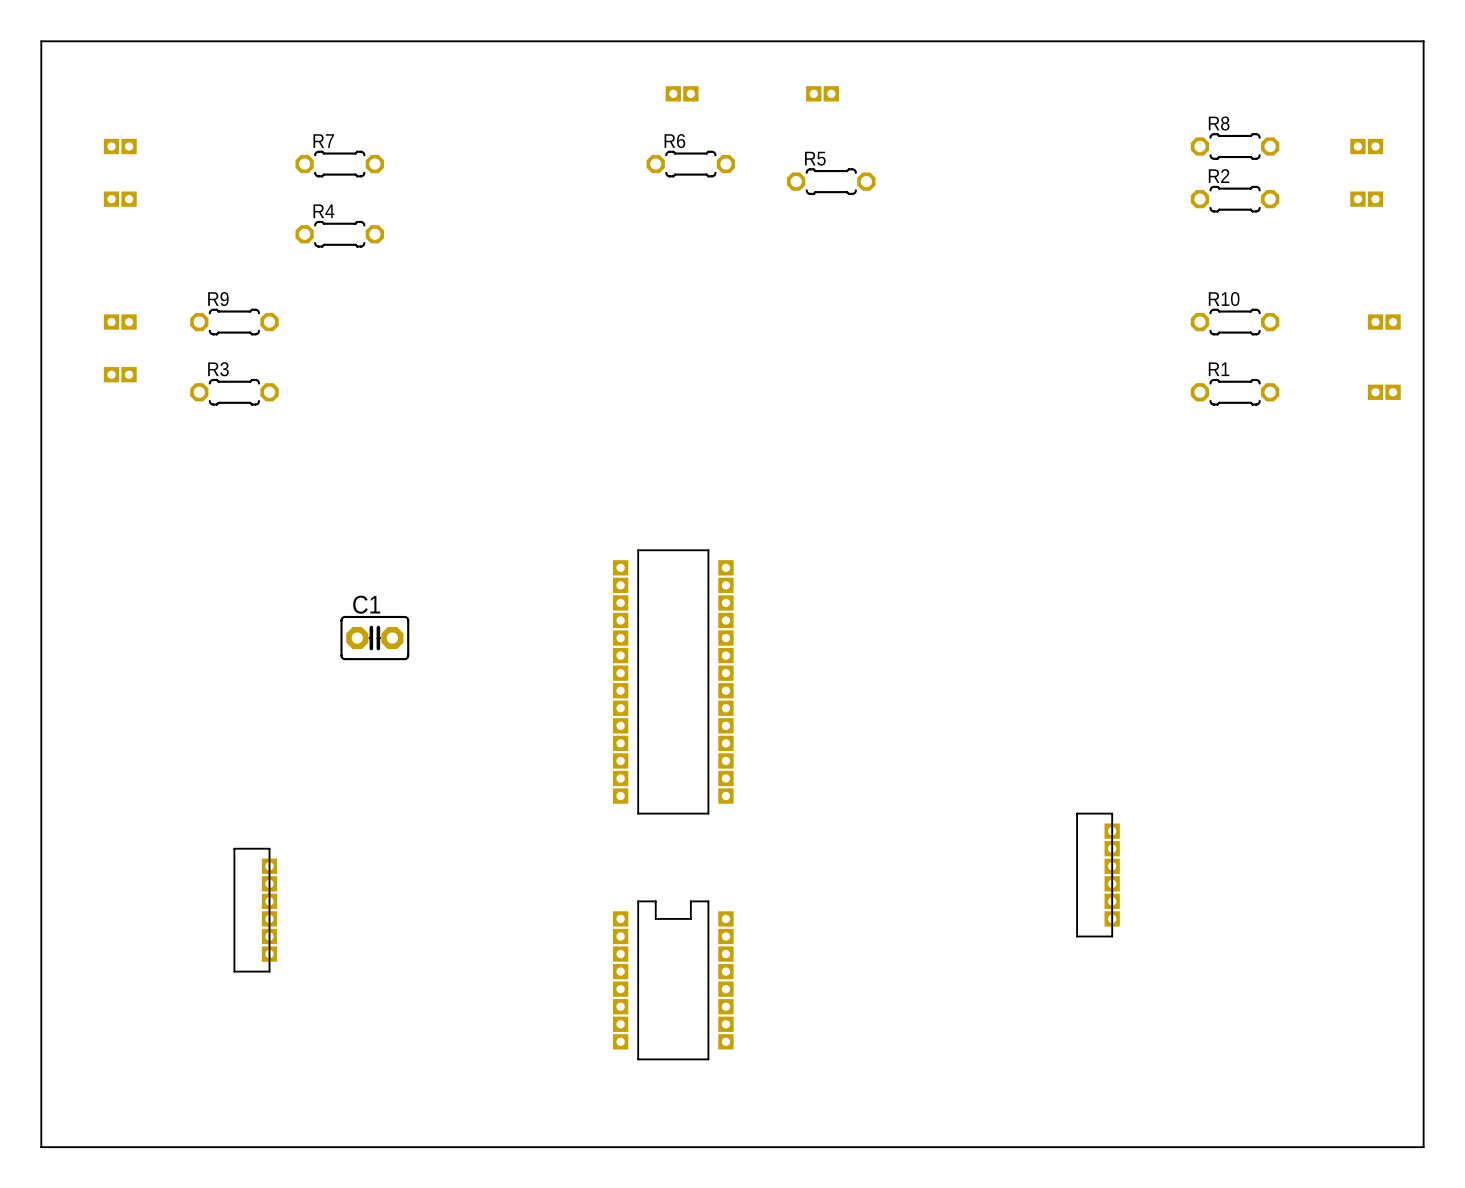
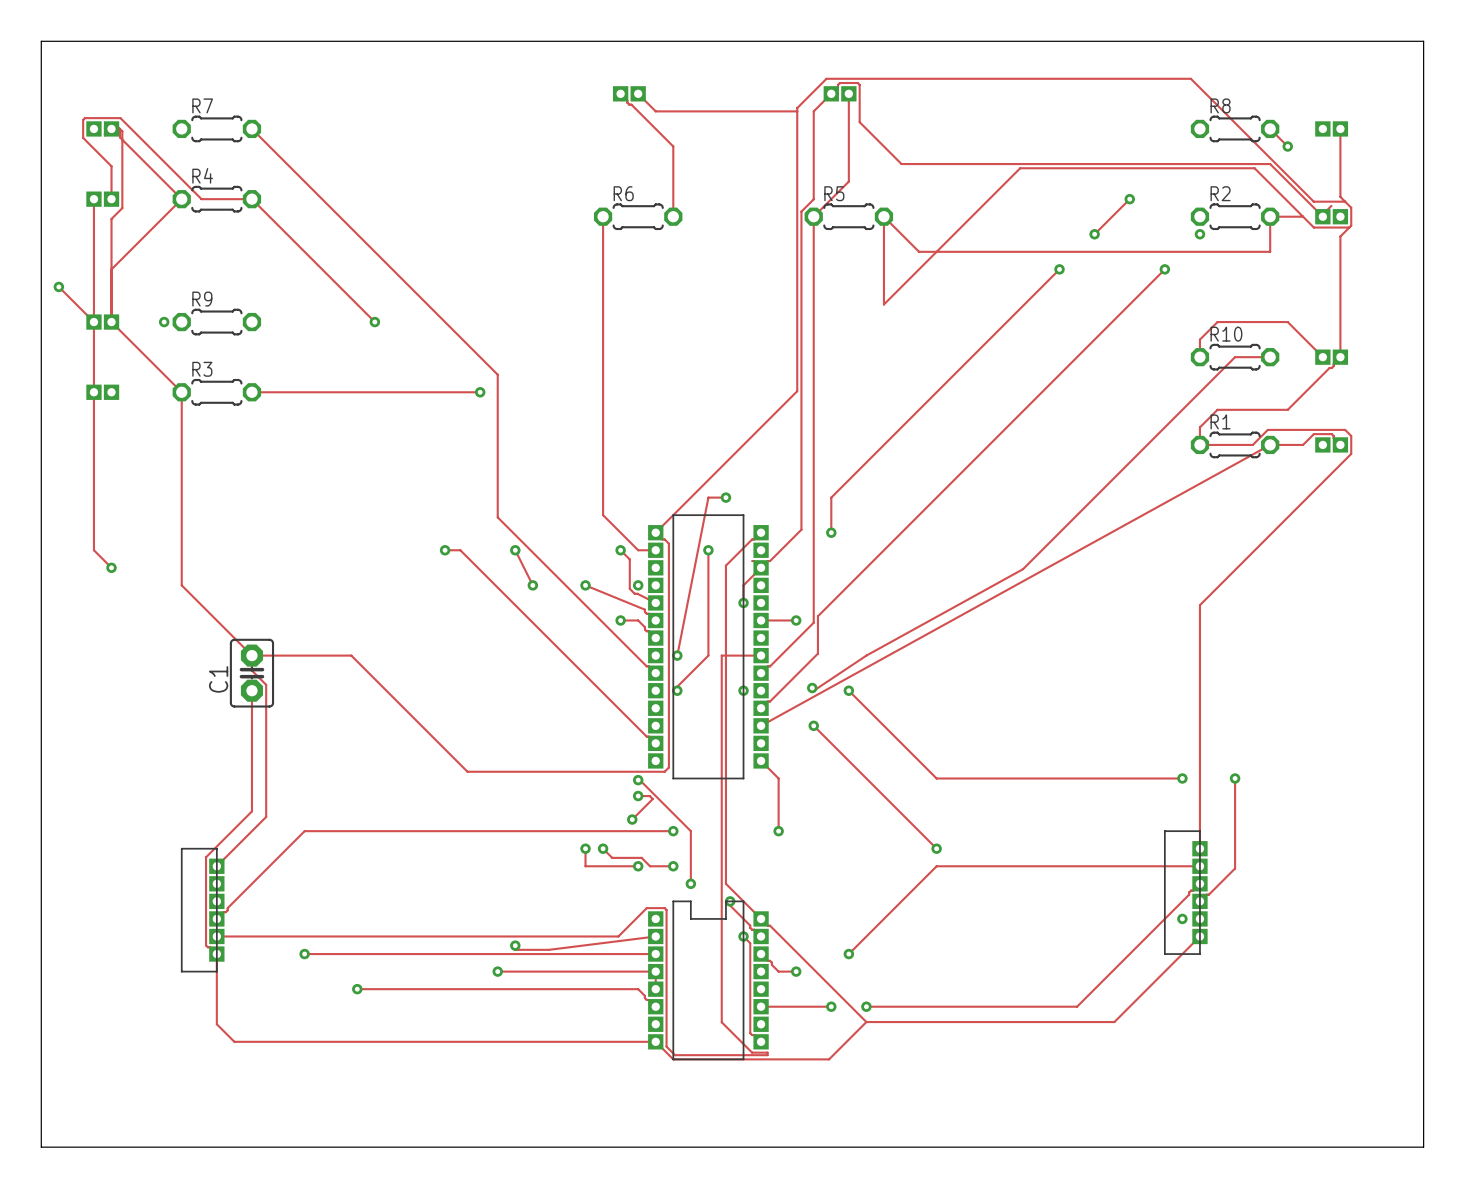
track: none -> (620, 93) (627, 102) (673, 146) (673, 216)
track: none -> (638, 93) (655, 111) (797, 111)
part position: (682, 93) -> (629, 93)
part position: (822, 93) -> (840, 93)
track: none -> (848, 93) (848, 181) (813, 216) (813, 622) (761, 673)
track: none -> (111, 128) (117, 126) (122, 131) (122, 208) (111, 218) (111, 322) (181, 392) (181, 585) (251, 655)
track: none -> (119, 128) (119, 137) (181, 199) (111, 269)
track: none -> (251, 128) (497, 374) (497, 517) (655, 673)
track: none -> (1270, 128) (1287, 146)
part: none -> (1331, 128)
track: none -> (1340, 128) (1340, 196) (1351, 207) (1351, 225) (1340, 236) (1340, 357) (1331, 367) (1329, 367) (1287, 409) (1217, 409) (1199, 427) (1199, 444) (1252, 444) (1267, 429) (1345, 429) (1351, 435) (1351, 453) (1199, 605) (1199, 848)
part position: (120, 146) -> (102, 128)
R8 position: (1235, 146) -> (1235, 128)
via: none -> (1287, 146)
part: (1366, 146) -> none
R7 position: (339, 164) -> (216, 128)
R6 position: (690, 164) -> (638, 216)
R5 position: (831, 181) -> (848, 216)
track: none -> (93, 199) (93, 550) (111, 567)
track: none -> (111, 199) (111, 166) (83, 137) (83, 119) (84, 118) (120, 118) (201, 199) (251, 199) (374, 322)
part position: (120, 199) -> (102, 199)
track: none -> (1129, 199) (1094, 234)
via: none -> (1129, 199)
R2 position: (1235, 199) -> (1235, 216)
part: (1366, 199) -> none
track: none -> (1345, 201) (1313, 201) (1190, 78) (826, 78) (797, 108) (797, 391) (655, 532) (668, 543) (668, 767) (664, 771) (467, 771) (351, 655) (251, 655)
track: none -> (1331, 205) (1322, 216) (1270, 164) (901, 164) (859, 122) (859, 84) (857, 83) (839, 83) (813, 111) (813, 199) (801, 211) (801, 529) (743, 585) (743, 602)
track: none -> (603, 216) (603, 515) (638, 550) (655, 550)
track: none -> (1303, 216) (1270, 216) (1270, 251) (919, 251) (883, 216) (883, 304) (1020, 168) (1254, 168) (1313, 227) (1349, 227)
part: none -> (1331, 216)
R4 position: (339, 234) -> (216, 199)
via: none -> (1094, 234)
via: none -> (1199, 234)
track: none -> (1059, 269) (831, 497) (831, 532)
via: none -> (1059, 269)
track: none -> (1164, 269) (817, 616) (817, 653) (761, 708)
via: none -> (1164, 269)
track: none -> (58, 286) (93, 322)
via: none -> (58, 286)
part position: (120, 322) -> (102, 322)
via: none -> (164, 322)
R9 position: (234, 322) -> (216, 322)
via: none -> (374, 322)
R10 position: (1235, 322) -> (1235, 357)
part: (1384, 322) -> none
track: none -> (1199, 357) (1199, 339) (1217, 322) (1287, 322) (1322, 357)
track: none -> (1270, 357) (1235, 357) (1023, 569) (866, 655) (813, 690) (812, 688)
part: none -> (1331, 357)
part position: (120, 374) -> (102, 392)
R3 position: (234, 392) -> (216, 392)
track: none -> (251, 392) (480, 392)
via: none -> (480, 392)
R1 position: (1235, 392) -> (1235, 444)
part: (1384, 392) -> none
part: none -> (1331, 444)
track: none -> (1340, 444) (1331, 434) (1313, 434) (1303, 444) (1270, 444) (761, 725) (767, 719)
track: none -> (725, 497) (708, 497) (677, 655)
via: none -> (725, 497)
track: none -> (761, 532) (725, 565) (725, 883) (866, 1022)
via: none -> (831, 532)
track: none -> (445, 550) (460, 550) (646, 736) (655, 743)
via: none -> (445, 550)
track: none -> (515, 550) (532, 585)
via: none -> (515, 550)
track: none -> (620, 550) (629, 559) (629, 588) (634, 593) (655, 602)
via: none -> (620, 550)
track: none -> (708, 550) (708, 655) (673, 690) (677, 690)
via: none -> (708, 550)
track: none -> (752, 561) (754, 561)
via: none -> (111, 567)
via: none -> (532, 585)
track: none -> (585, 585) (644, 609) (646, 613) (655, 620)
via: none -> (585, 585)
via: none -> (638, 585)
via: none -> (743, 602)
C1 name position: C1 (366, 604) -> C1 (218, 679)
track: none -> (620, 620) (638, 620) (644, 629) (655, 638)
via: none -> (620, 620)
track: none -> (761, 620) (796, 620)
via: none -> (796, 620)
C1 rotation: 0° (374, 638) -> 90° clockwise (251, 673)
C1 position: (374, 638) -> (251, 673)
track: none -> (251, 655) (251, 670) (266, 684) (266, 816) (216, 866)
via: none -> (677, 655)
track: none -> (761, 655) (721, 655) (721, 1022) (752, 1052) (767, 1052) (767, 1055) (675, 1055) (666, 1046) (666, 909) (664, 908) (646, 908) (618, 936) (216, 936)
part position: (673, 681) -> (708, 646)
via: none -> (812, 688)
track: none -> (251, 690) (251, 811) (206, 857) (206, 945) (216, 954) (216, 1024) (234, 1041) (655, 1041) (673, 1059) (829, 1059) (866, 1022)
via: none -> (677, 690)
via: none -> (743, 690)
track: none -> (848, 690) (936, 778) (1182, 778)
via: none -> (848, 690)
track: none -> (813, 725) (936, 848)
via: none -> (813, 725)
track: none -> (761, 760) (778, 778) (778, 831)
via: none -> (1182, 778)
track: none -> (1235, 778) (1235, 868) (1199, 901)
via: none -> (1235, 778)
track: none -> (638, 780) (638, 778) (690, 831) (690, 883)
via: none -> (638, 780)
track: none -> (638, 796) (649, 796) (652, 799) (632, 819)
via: none -> (638, 796)
via: none -> (632, 819)
track: none -> (673, 831) (304, 831) (227, 908) (225, 912) (216, 918)
via: none -> (673, 831)
via: none -> (778, 831)
track: none -> (585, 848) (585, 866) (638, 866)
via: none -> (585, 848)
track: none -> (603, 848) (612, 857) (641, 857) (650, 866) (673, 866)
via: none -> (603, 848)
via: none -> (936, 848)
via: none -> (638, 866)
via: none -> (673, 866)
track: none -> (1199, 866) (936, 866) (848, 954)
part position: (1098, 875) -> (1185, 892)
via: none -> (690, 883)
track: none -> (1199, 883) (1191, 890) (1189, 894) (1077, 1006) (866, 1006)
track: none -> (730, 901) (725, 901) (752, 929) (761, 936)
via: none -> (730, 901)
part position: (255, 910) -> (202, 910)
via: none -> (1182, 918)
track: none -> (655, 936) (549, 949) (515, 949) (515, 945)
track: none -> (743, 936) (750, 943) (750, 1033) (761, 1041)
via: none -> (743, 936)
track: none -> (1199, 936) (1114, 1022) (866, 1022)
via: none -> (515, 945)
track: none -> (304, 954) (655, 954)
via: none -> (304, 954)
track: none -> (761, 954) (771, 962) (778, 971) (796, 971)
via: none -> (848, 954)
track: none -> (497, 971) (655, 971) (655, 989)
via: none -> (497, 971)
via: none -> (796, 971)
part position: (673, 980) -> (708, 980)
track: none -> (357, 989) (638, 989) (646, 999) (655, 1006)
via: none -> (357, 989)
track: none -> (761, 1006) (831, 1006)
via: none -> (831, 1006)
via: none -> (866, 1006)

